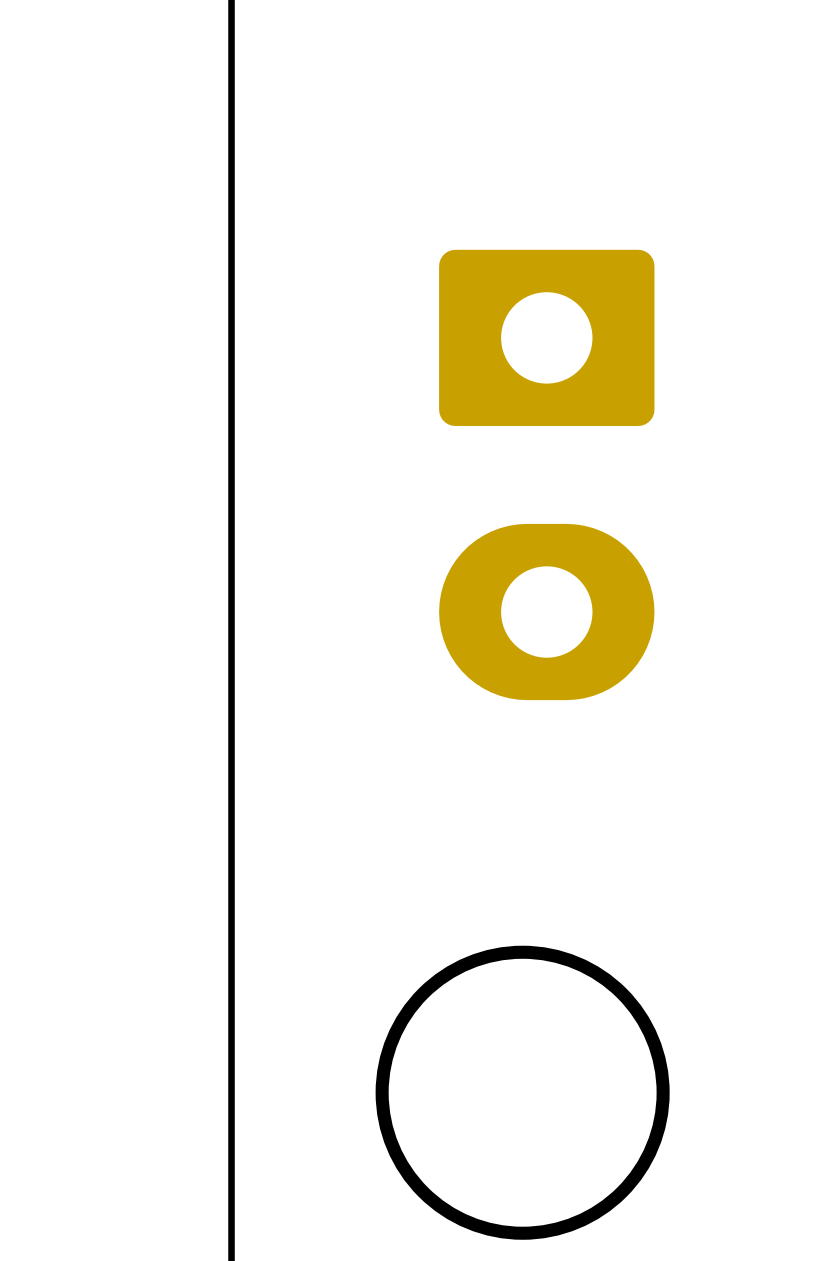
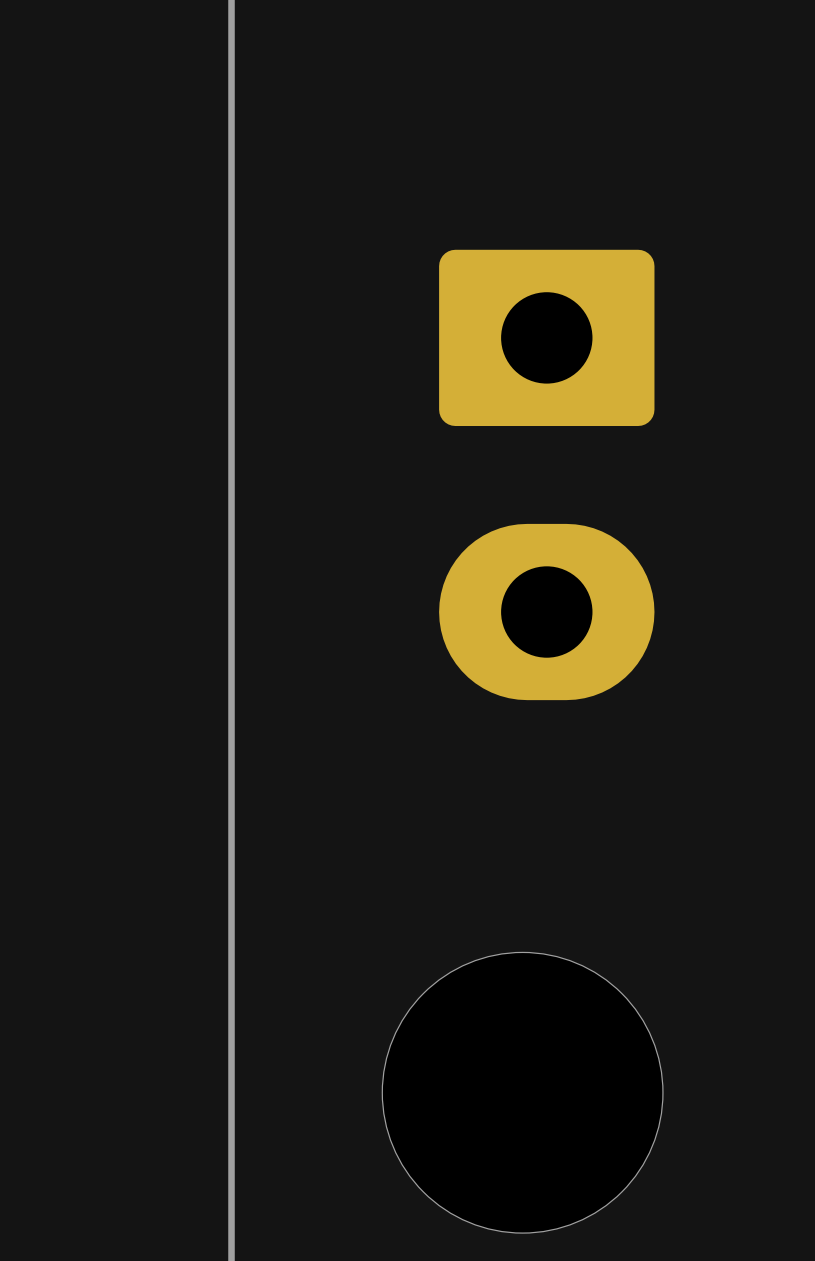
round board edge: [375, 945, 670, 1240] -> none

